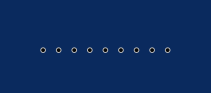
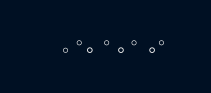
via: none -> (79, 42)
via: none -> (106, 42)
via: none -> (134, 42)
via: none -> (161, 42)
via: (43, 50) -> none
via: (58, 50) -> none
via: none -> (65, 50)
via: (74, 50) -> none
via: (105, 50) -> none
via: (136, 50) -> none
via: (167, 50) -> none

